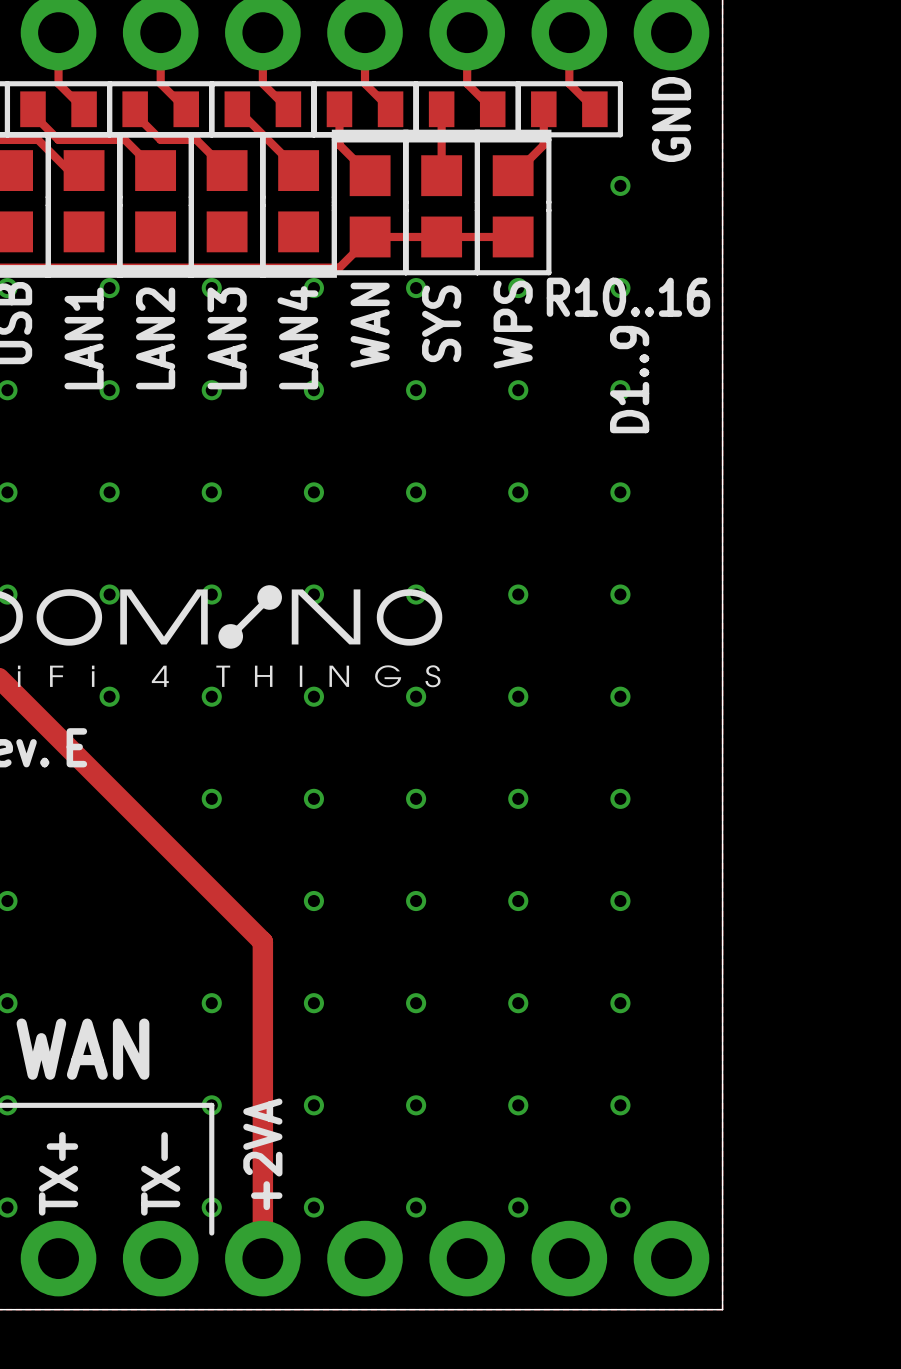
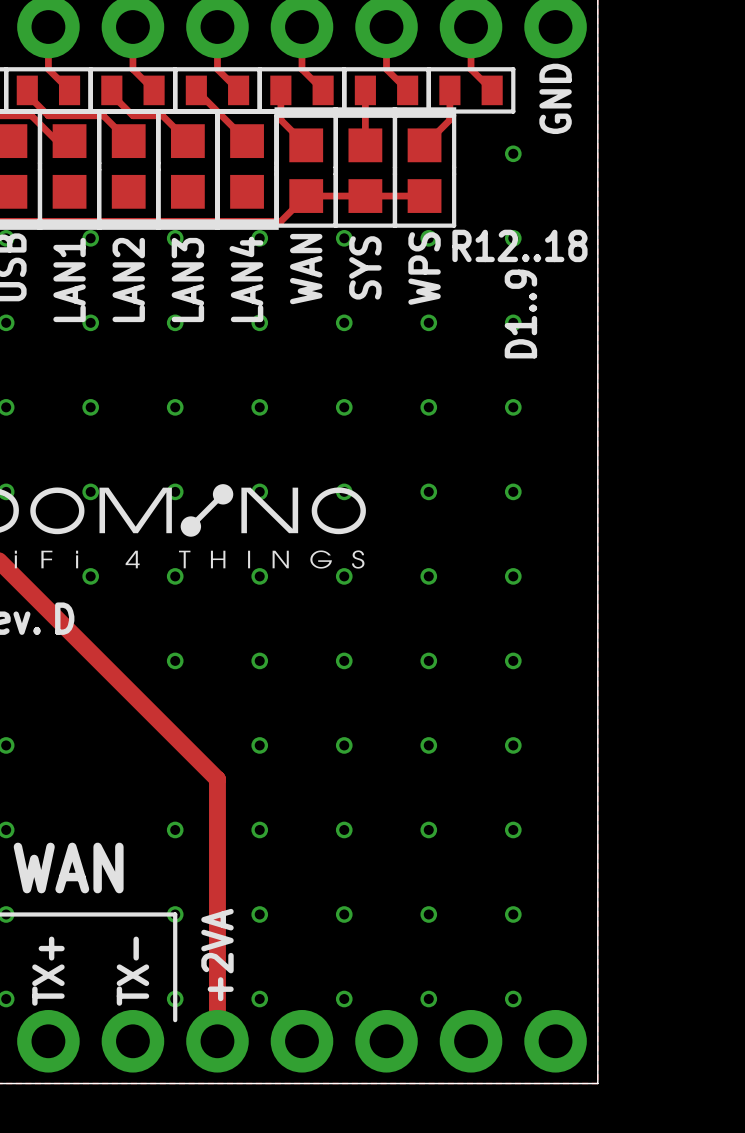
text: R10..16 (628, 297) -> R12..18 (519, 245)
text: E (76, 747) -> D (64, 618)

